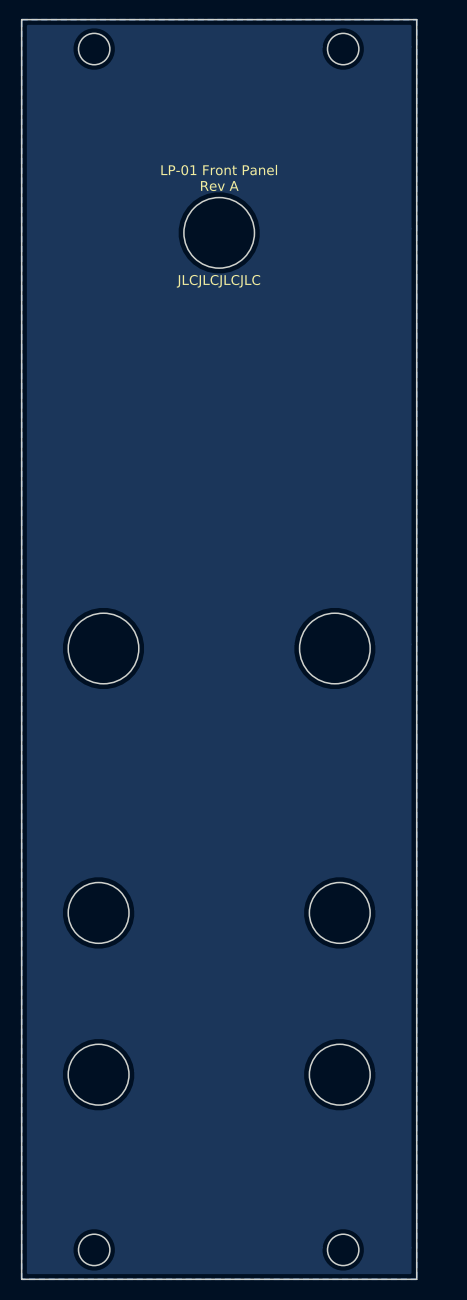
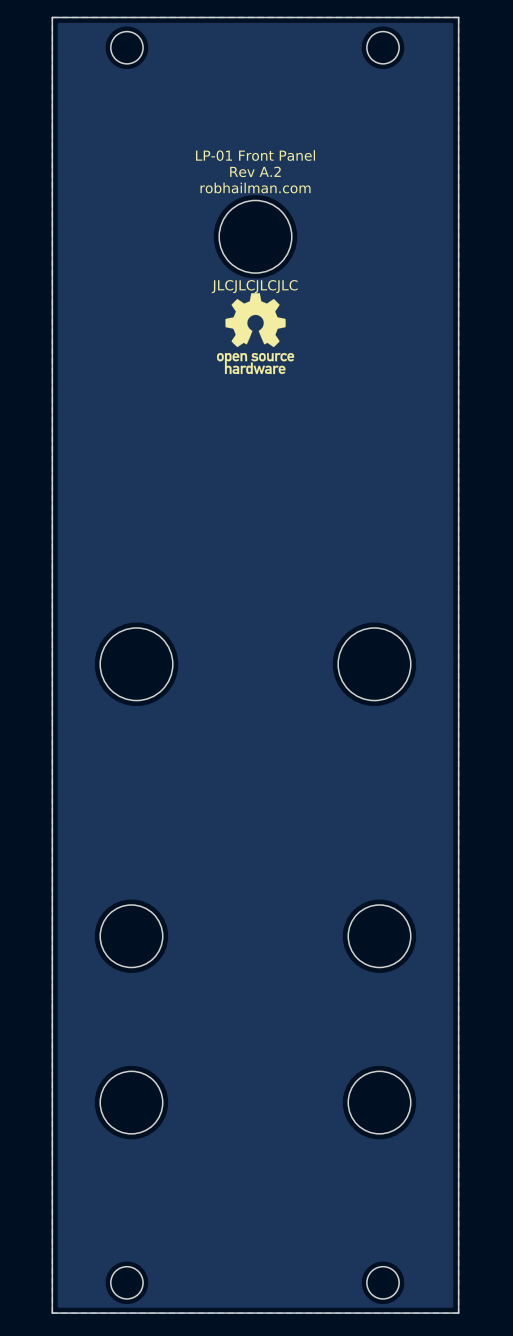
text: none -> LP-01 Front Panel (255, 155)
text: LP-01 Front Panel (219, 170) -> Rev A.2 (255, 171)
text: Rev A (219, 186) -> robhailman.com (255, 187)
drawing: none -> [217, 293, 295, 375]

